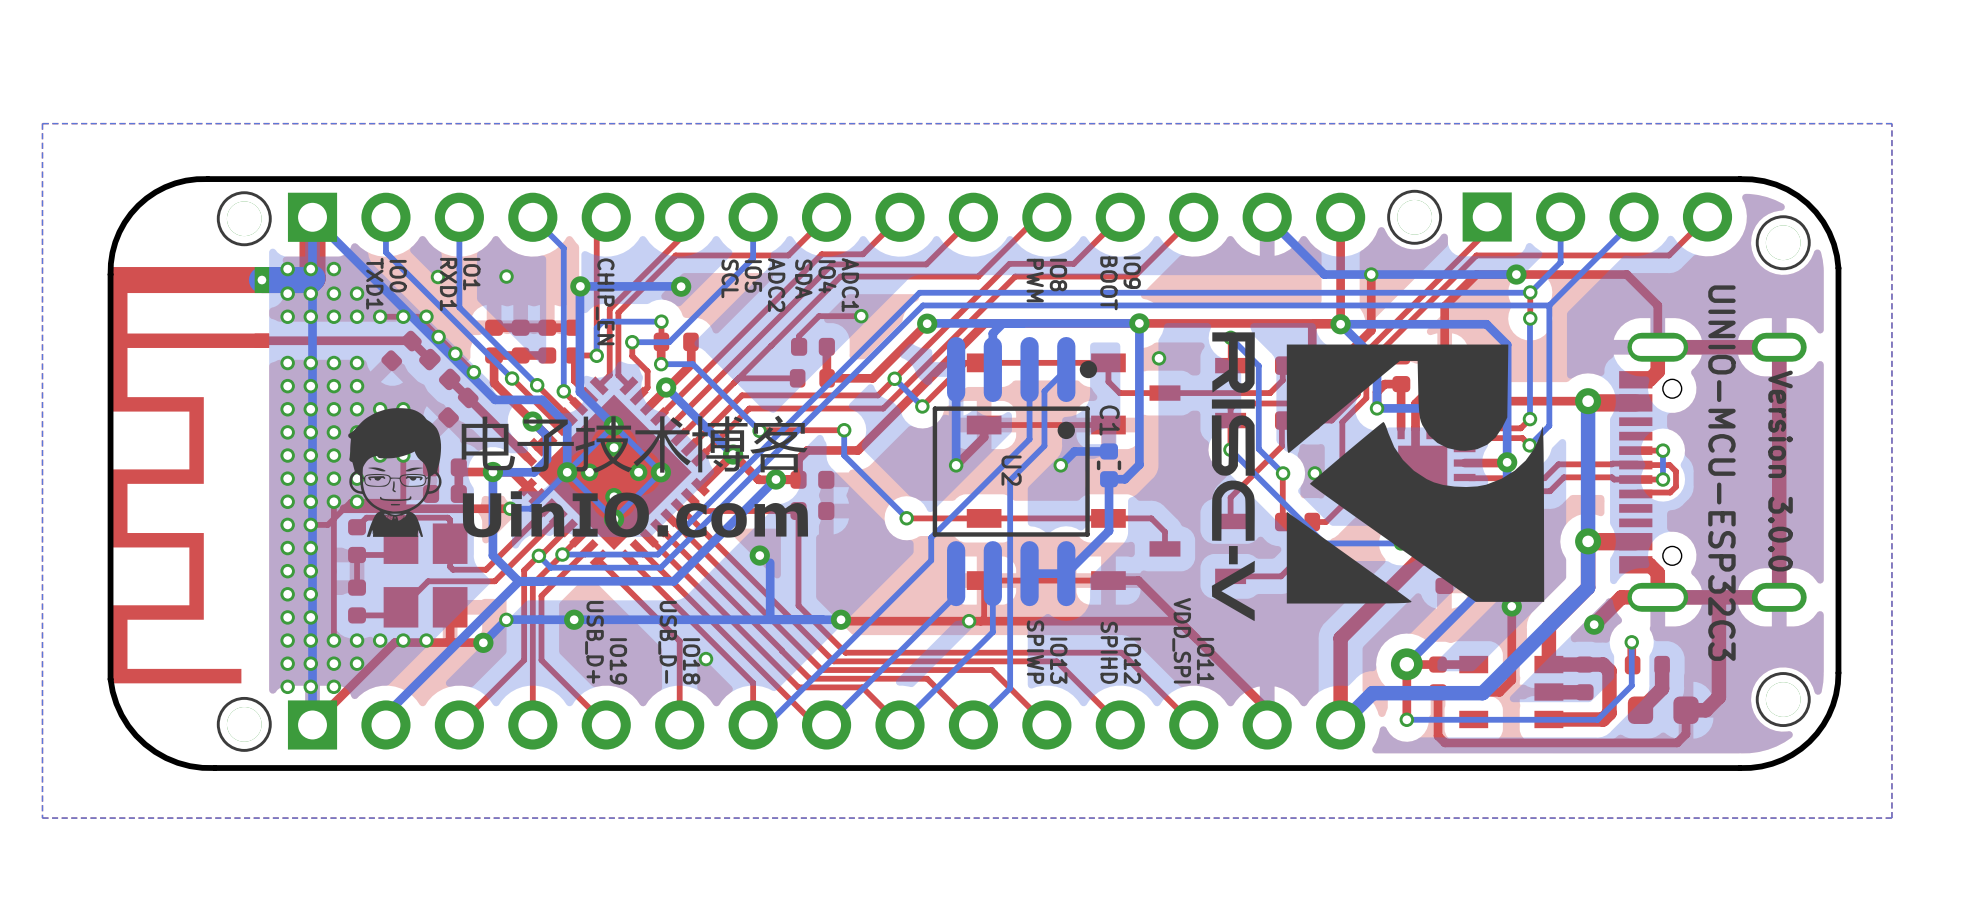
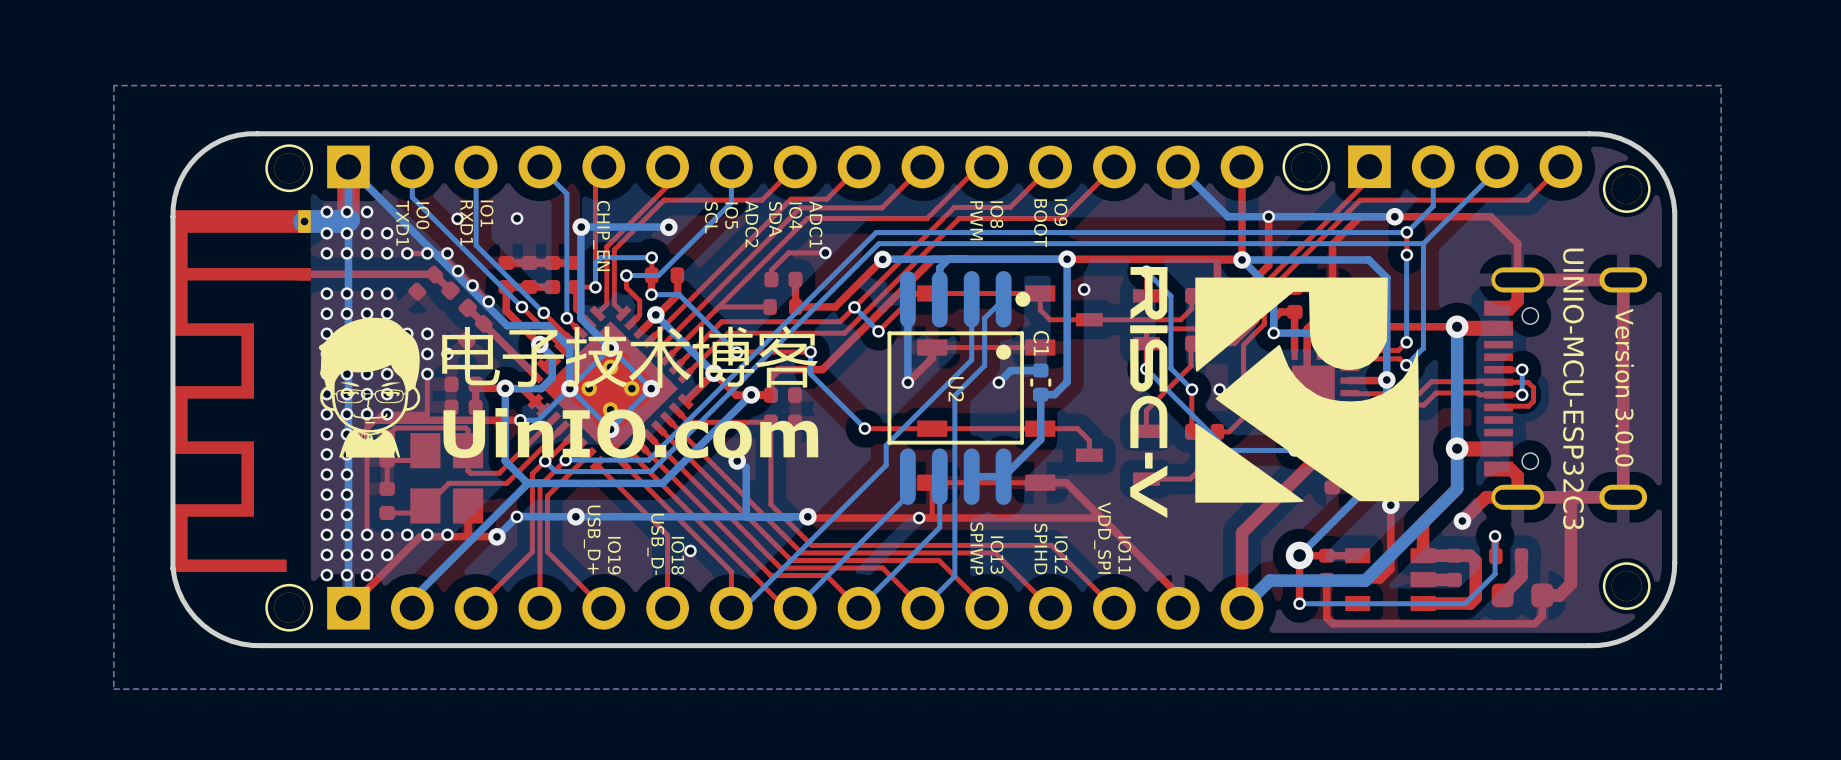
drawing shape: [348, 408, 809, 538] -> [318, 317, 819, 459]

